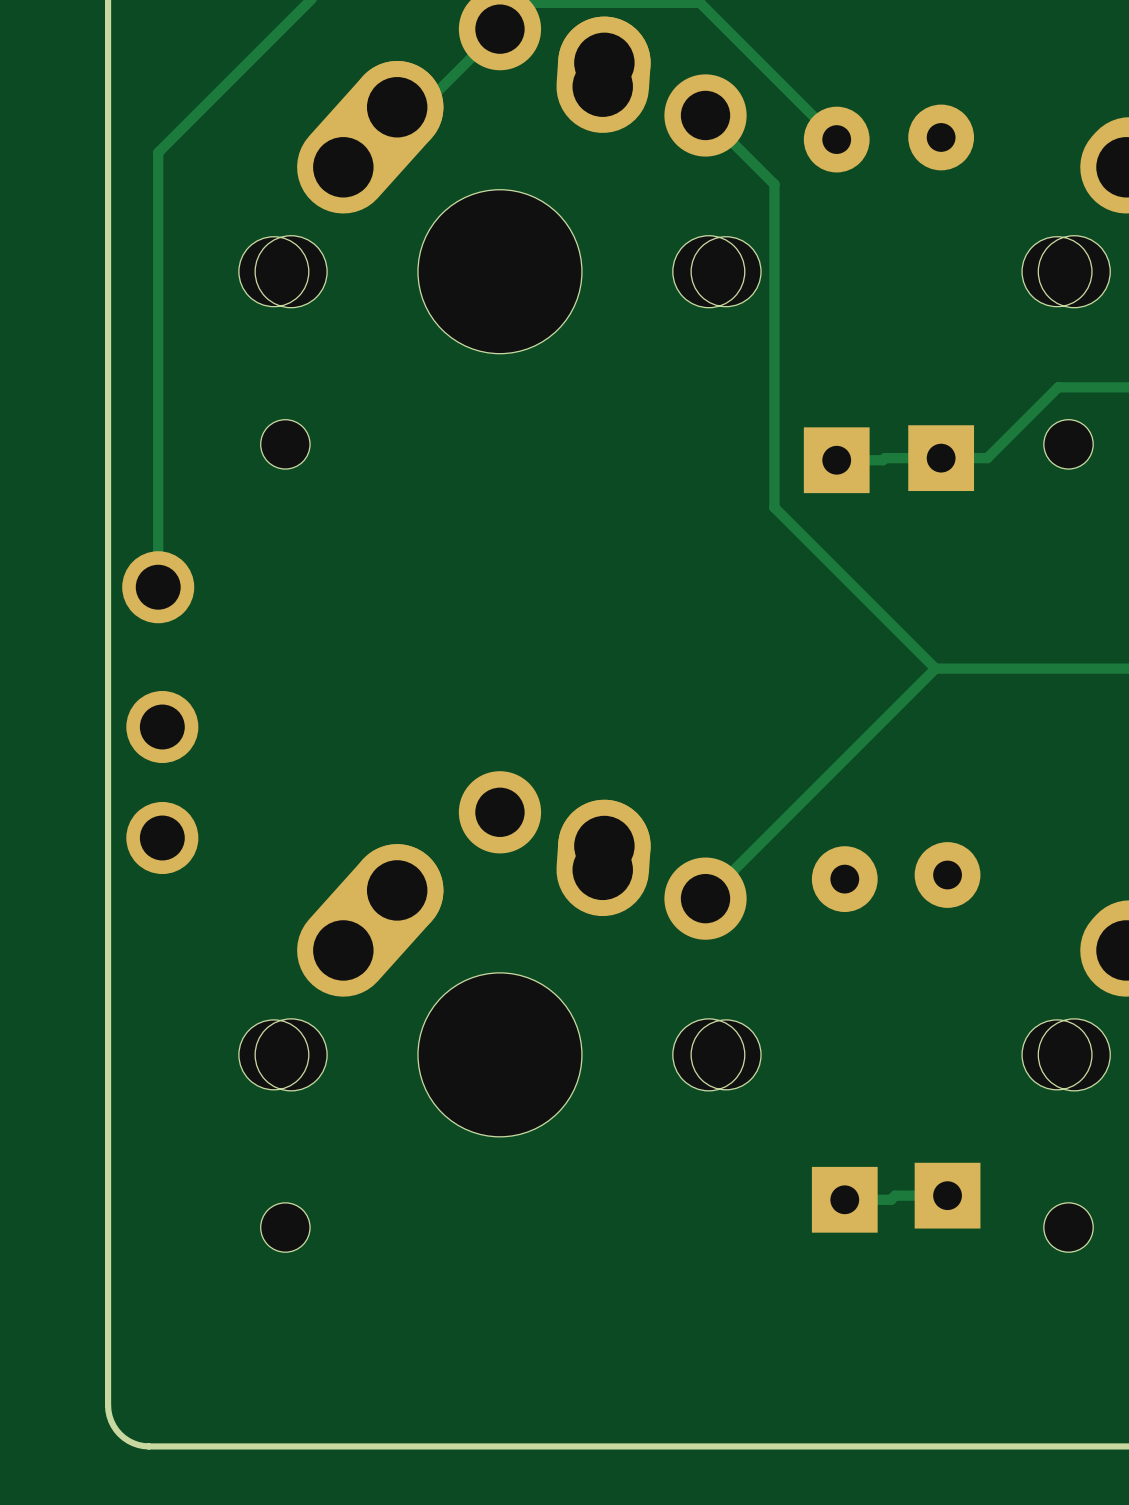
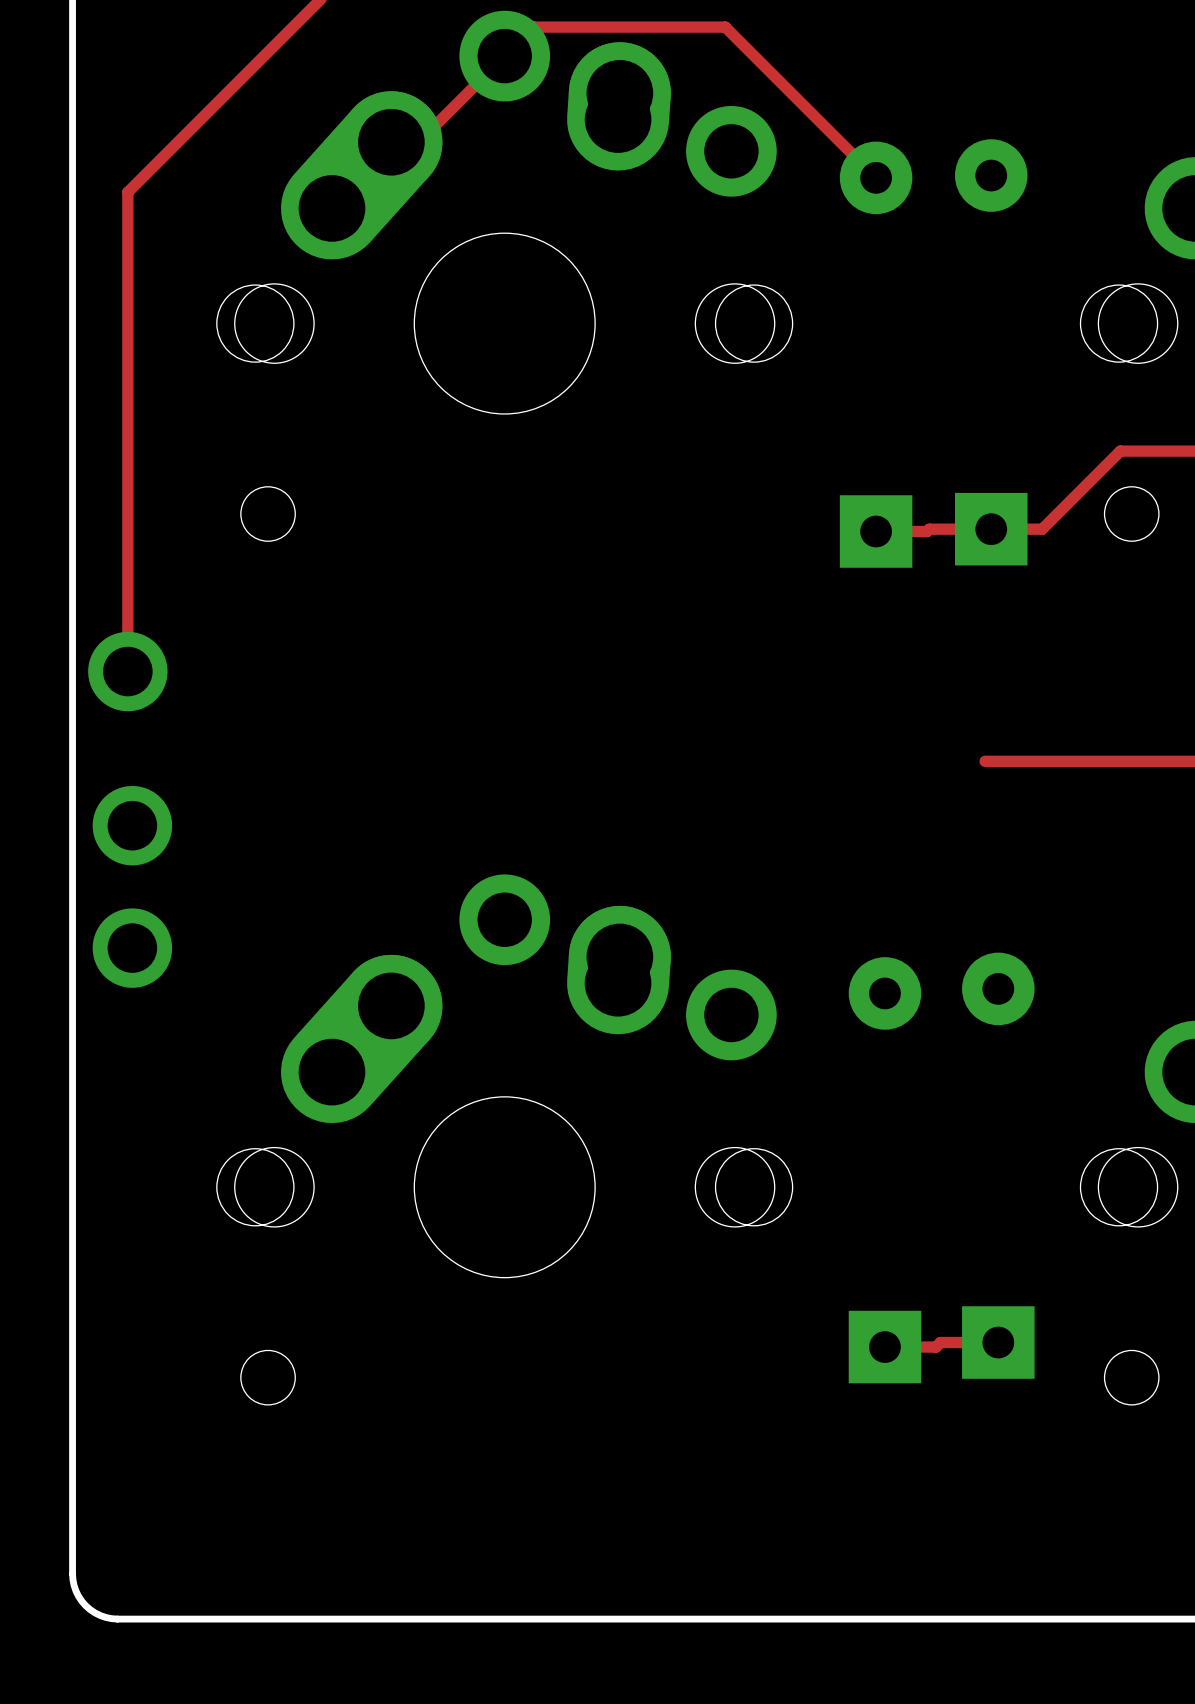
track: (705, 115) (774, 184) (774, 507) (935, 668) (705, 898) -> none

